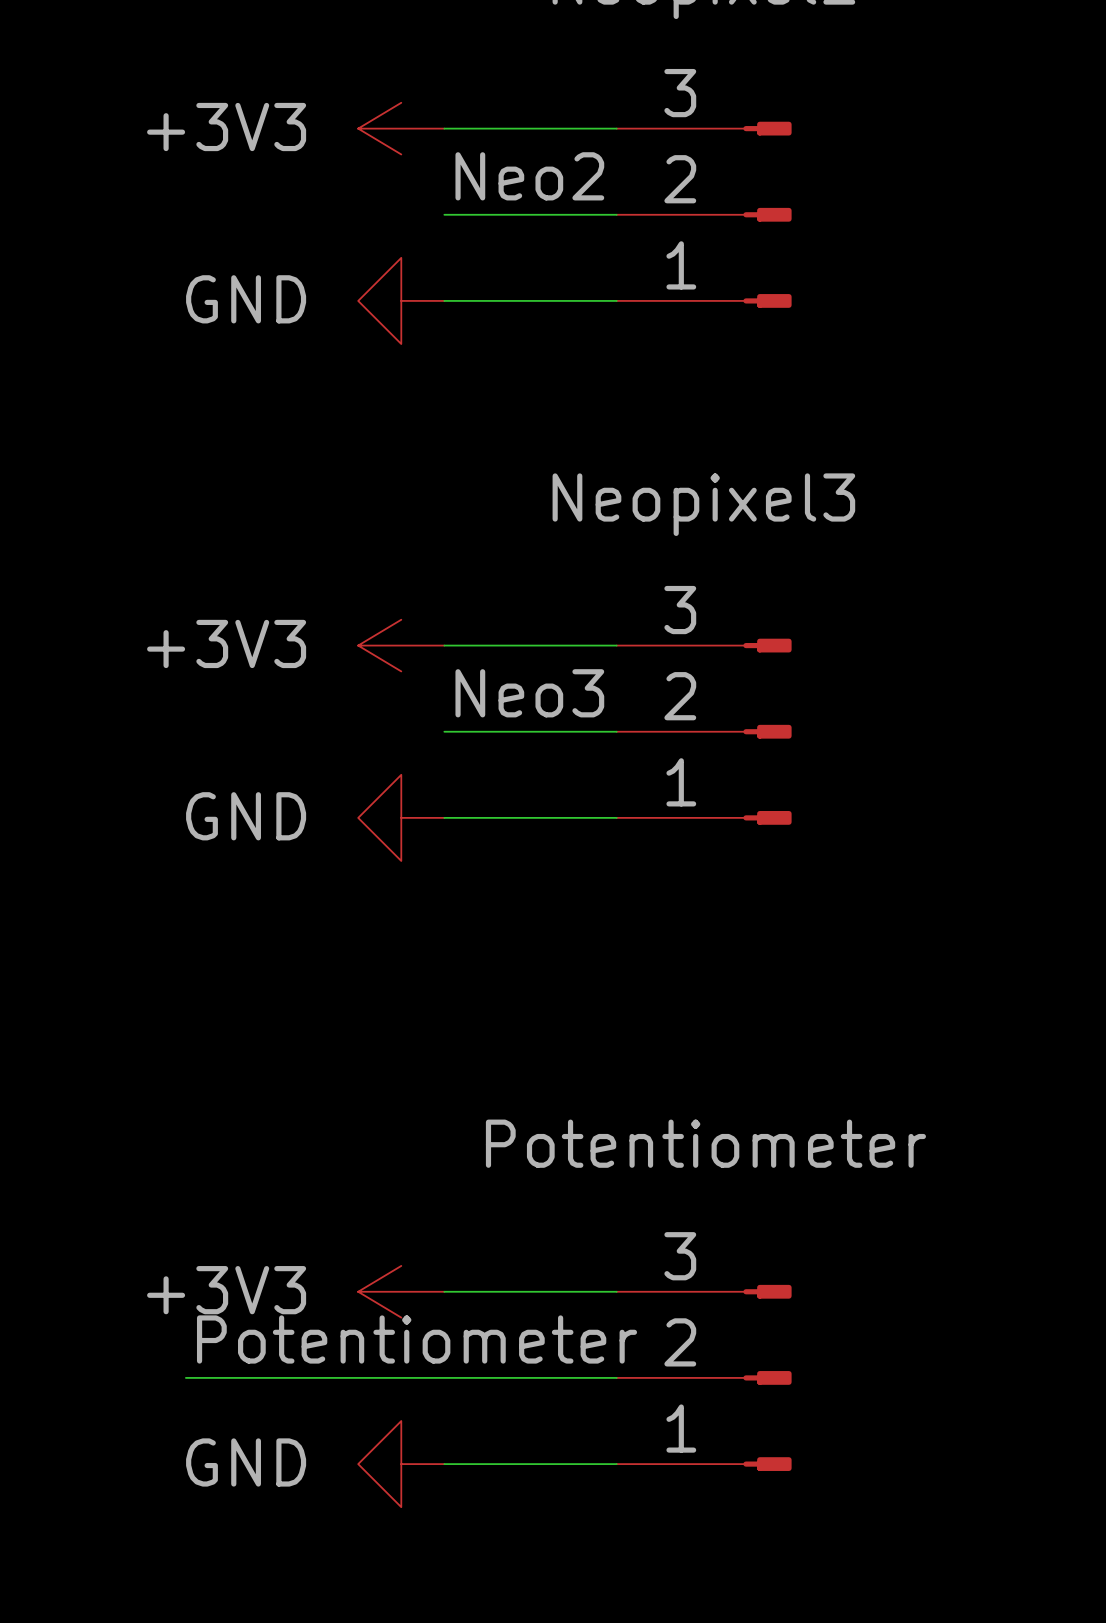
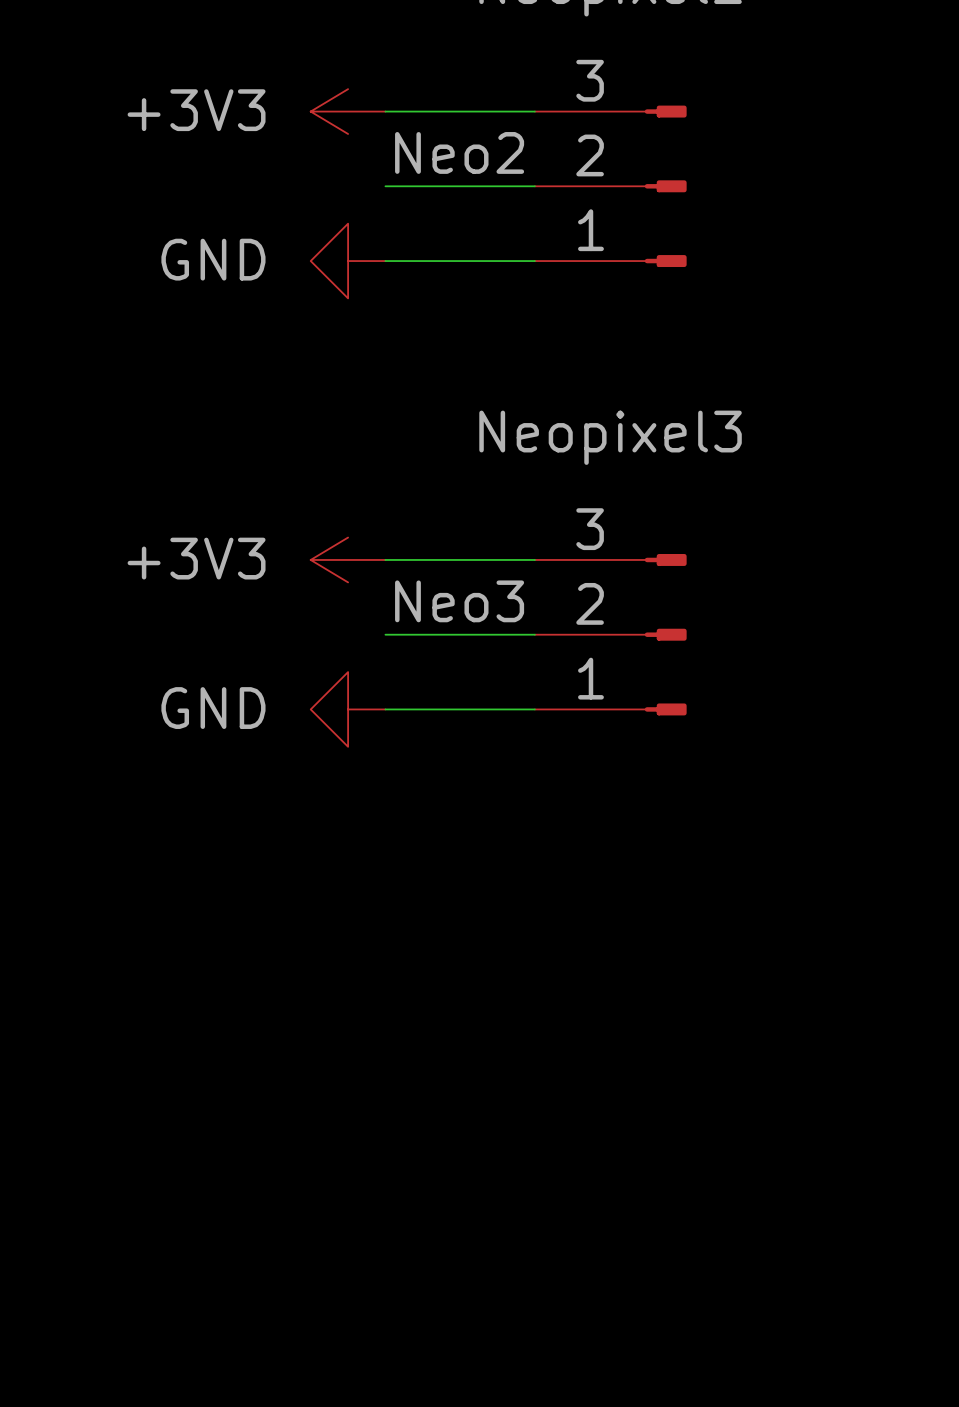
power symbol: +3V3 (401, 1291) -> none
wire: (444, 1291) (616, 1291) -> none
label: Potentiometer (417, 1339) -> none
wire: (185, 1377) (616, 1377) -> none
Potentiometer: (704, 1377) -> none
power symbol: GND (401, 1464) -> none
wire: (444, 1464) (616, 1464) -> none

